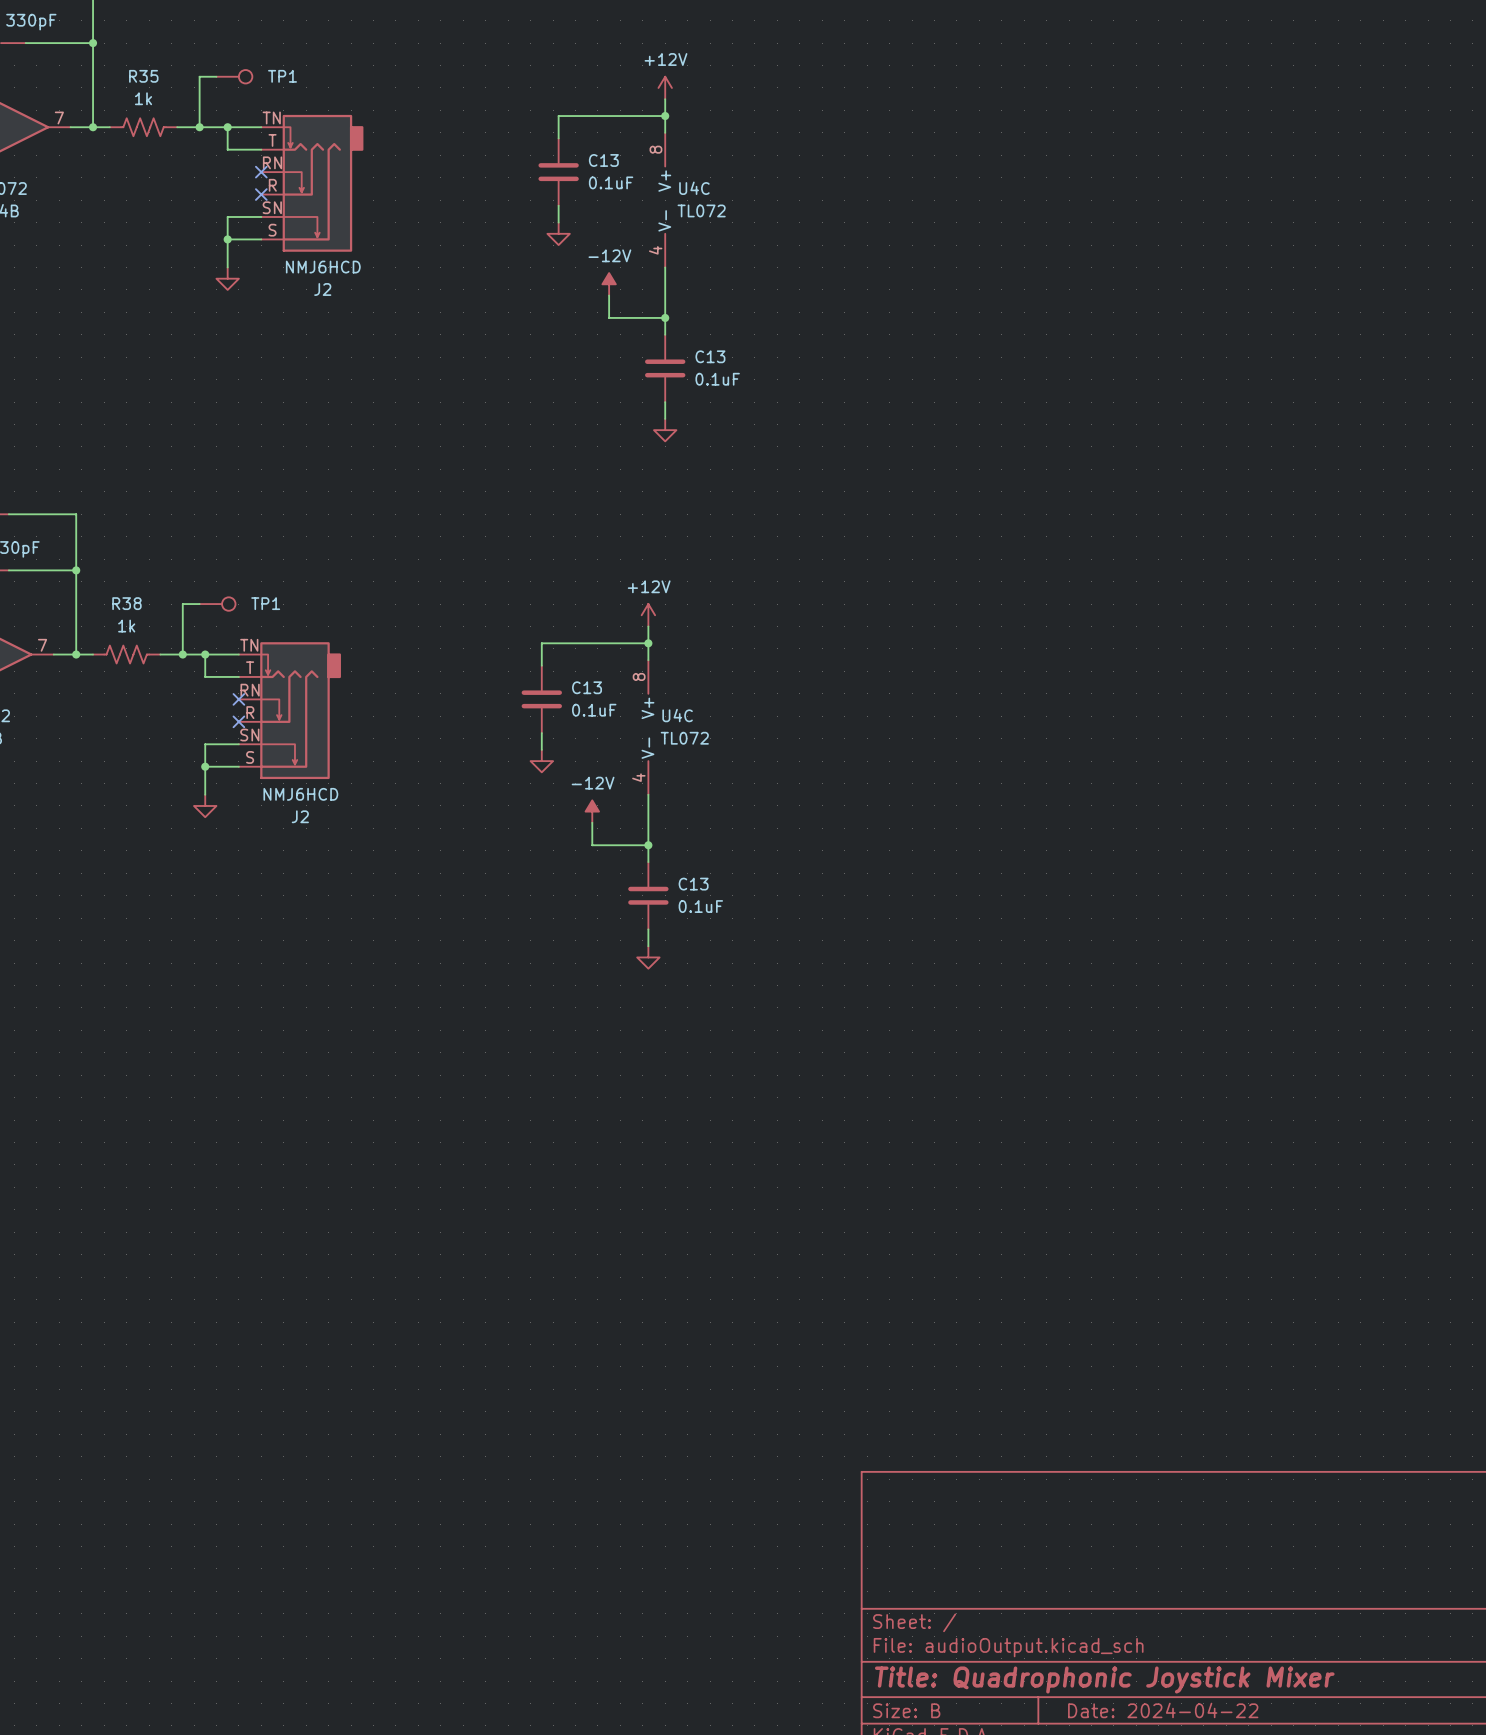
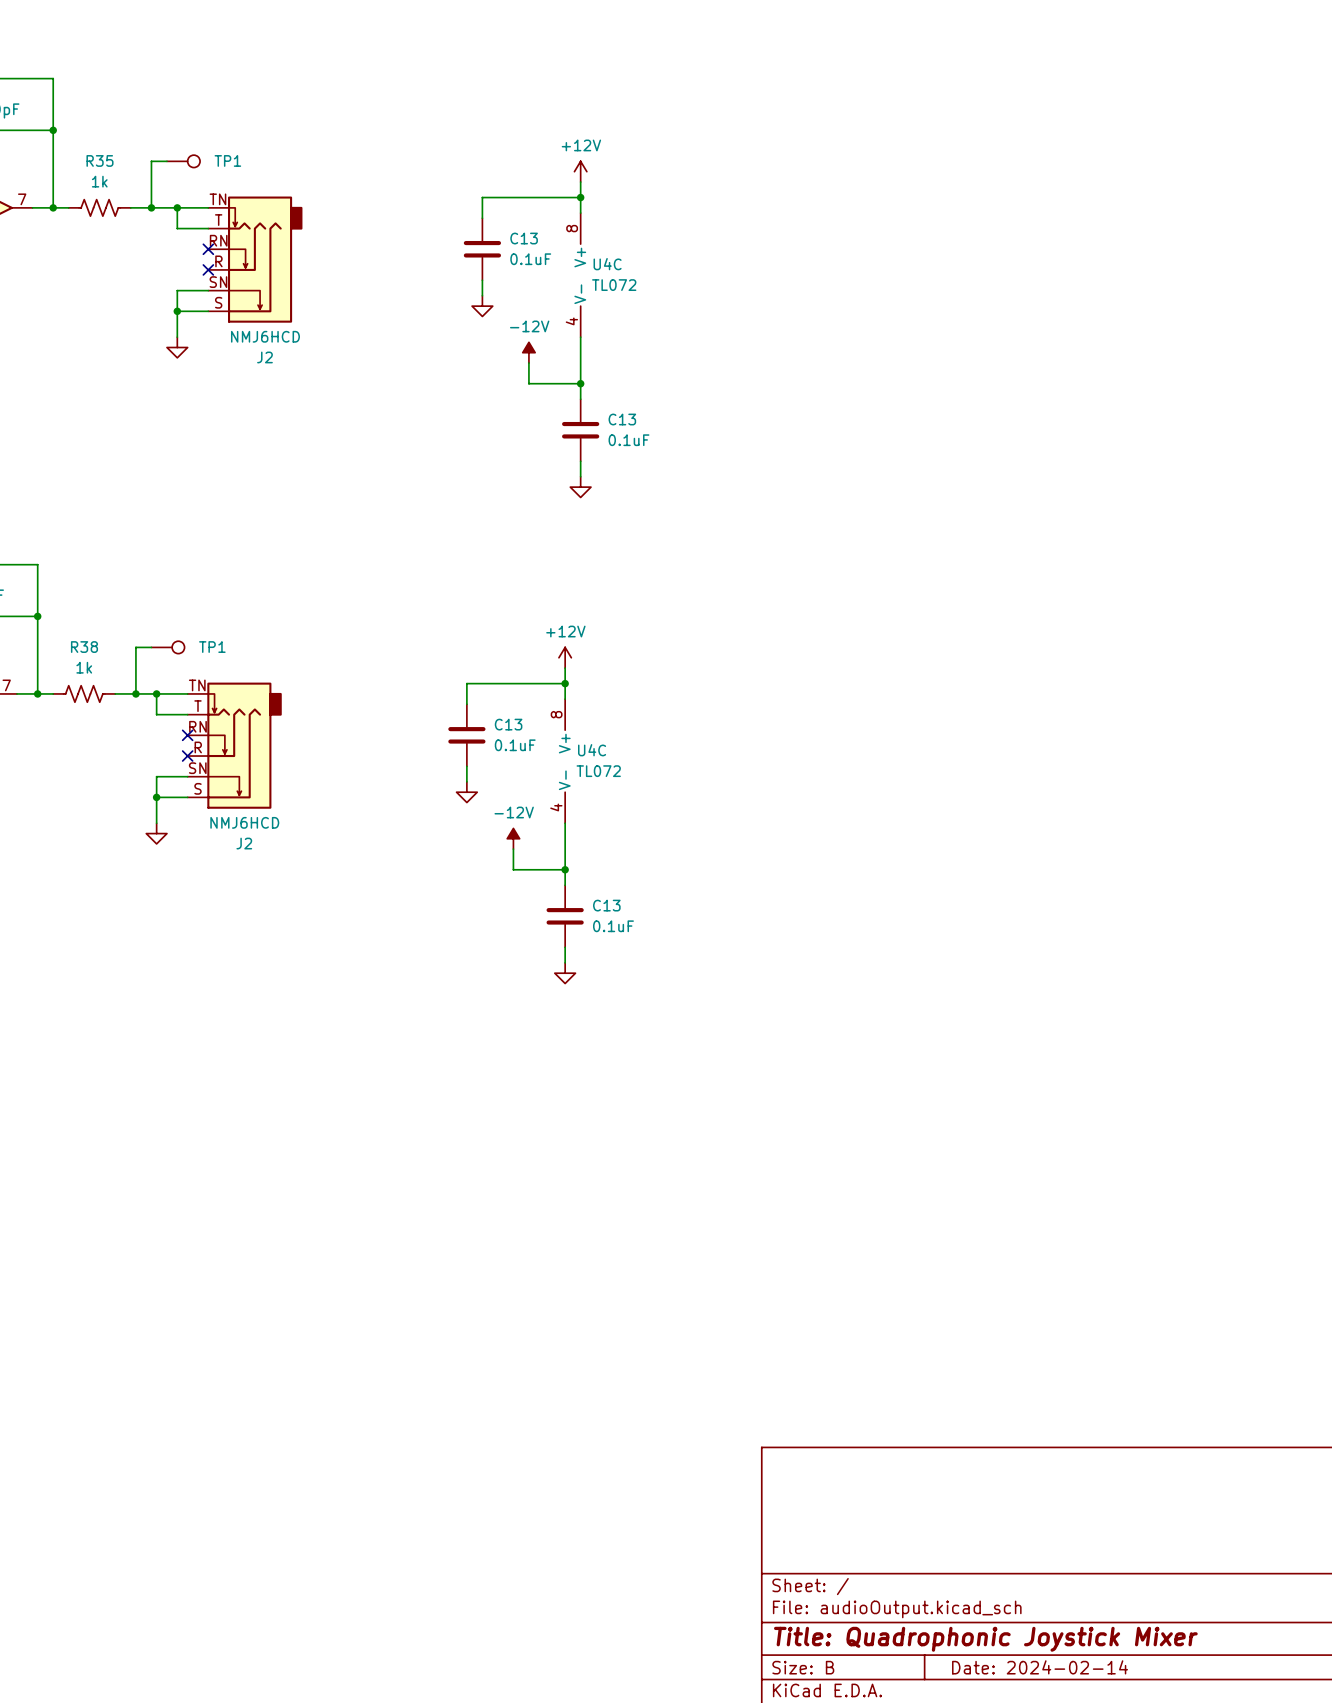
title block: Date: 2024-04-22 (1163, 1710) -> Date: 2024-02-14 (1040, 1667)

